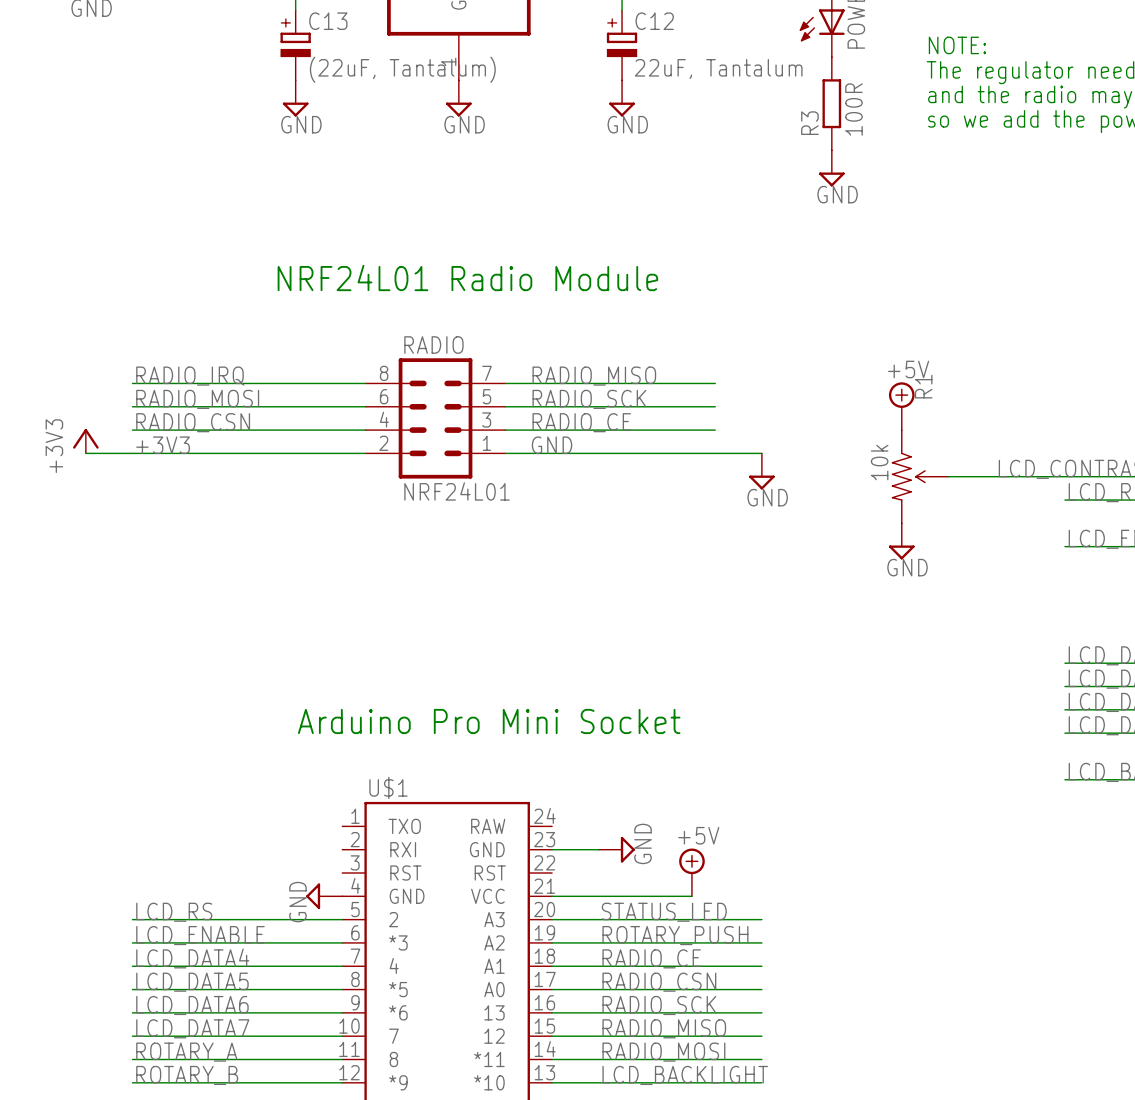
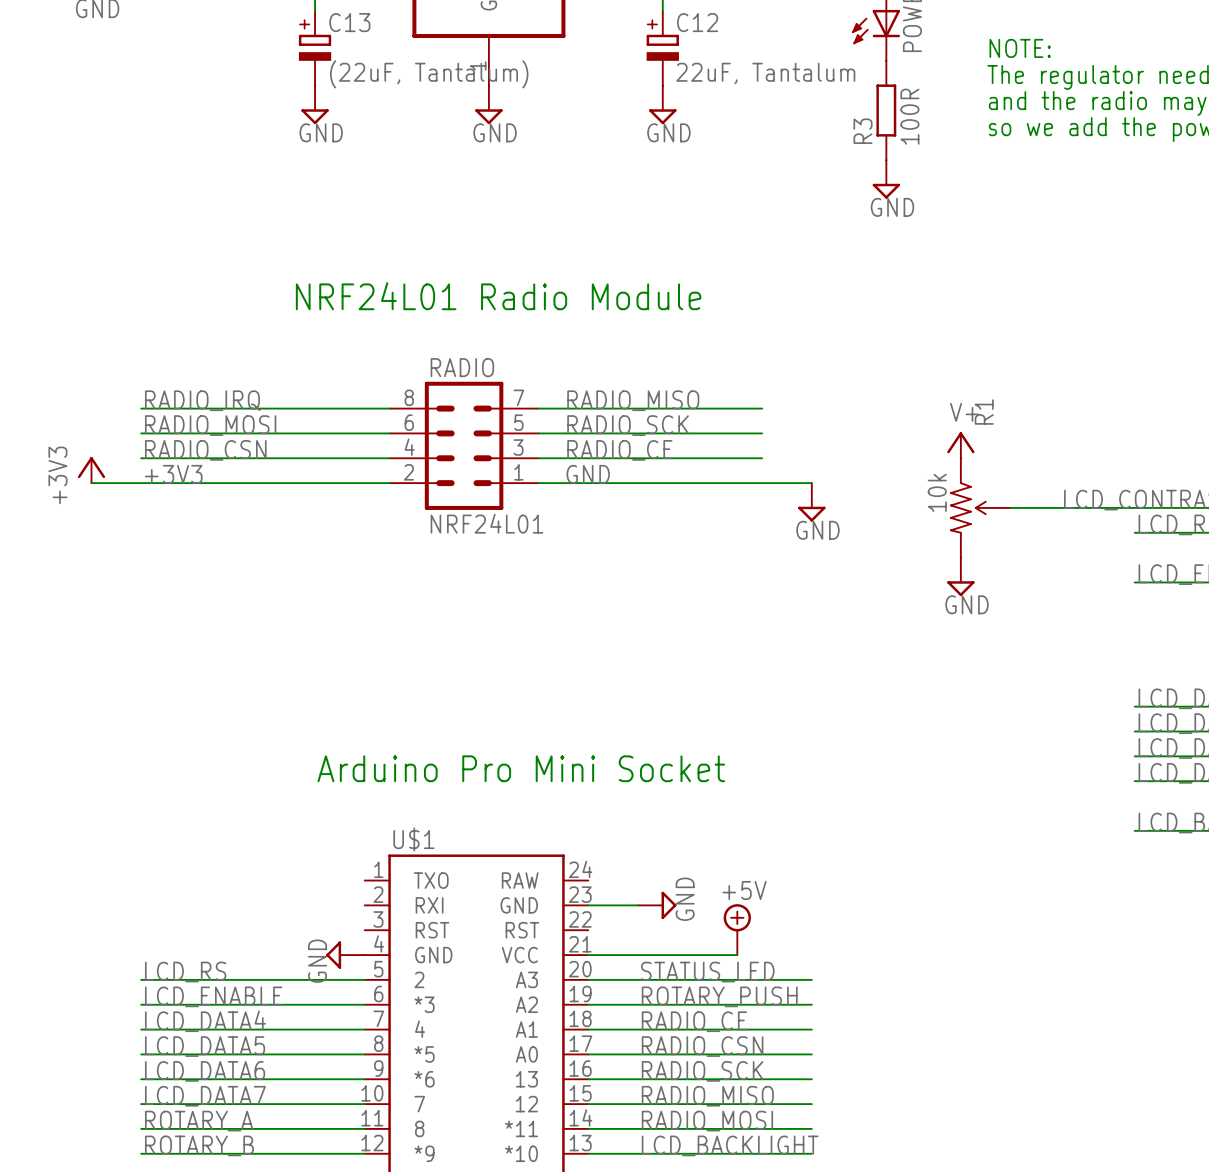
power symbol: +5V (901, 406) -> none
power symbol: none -> V+ (960, 445)

